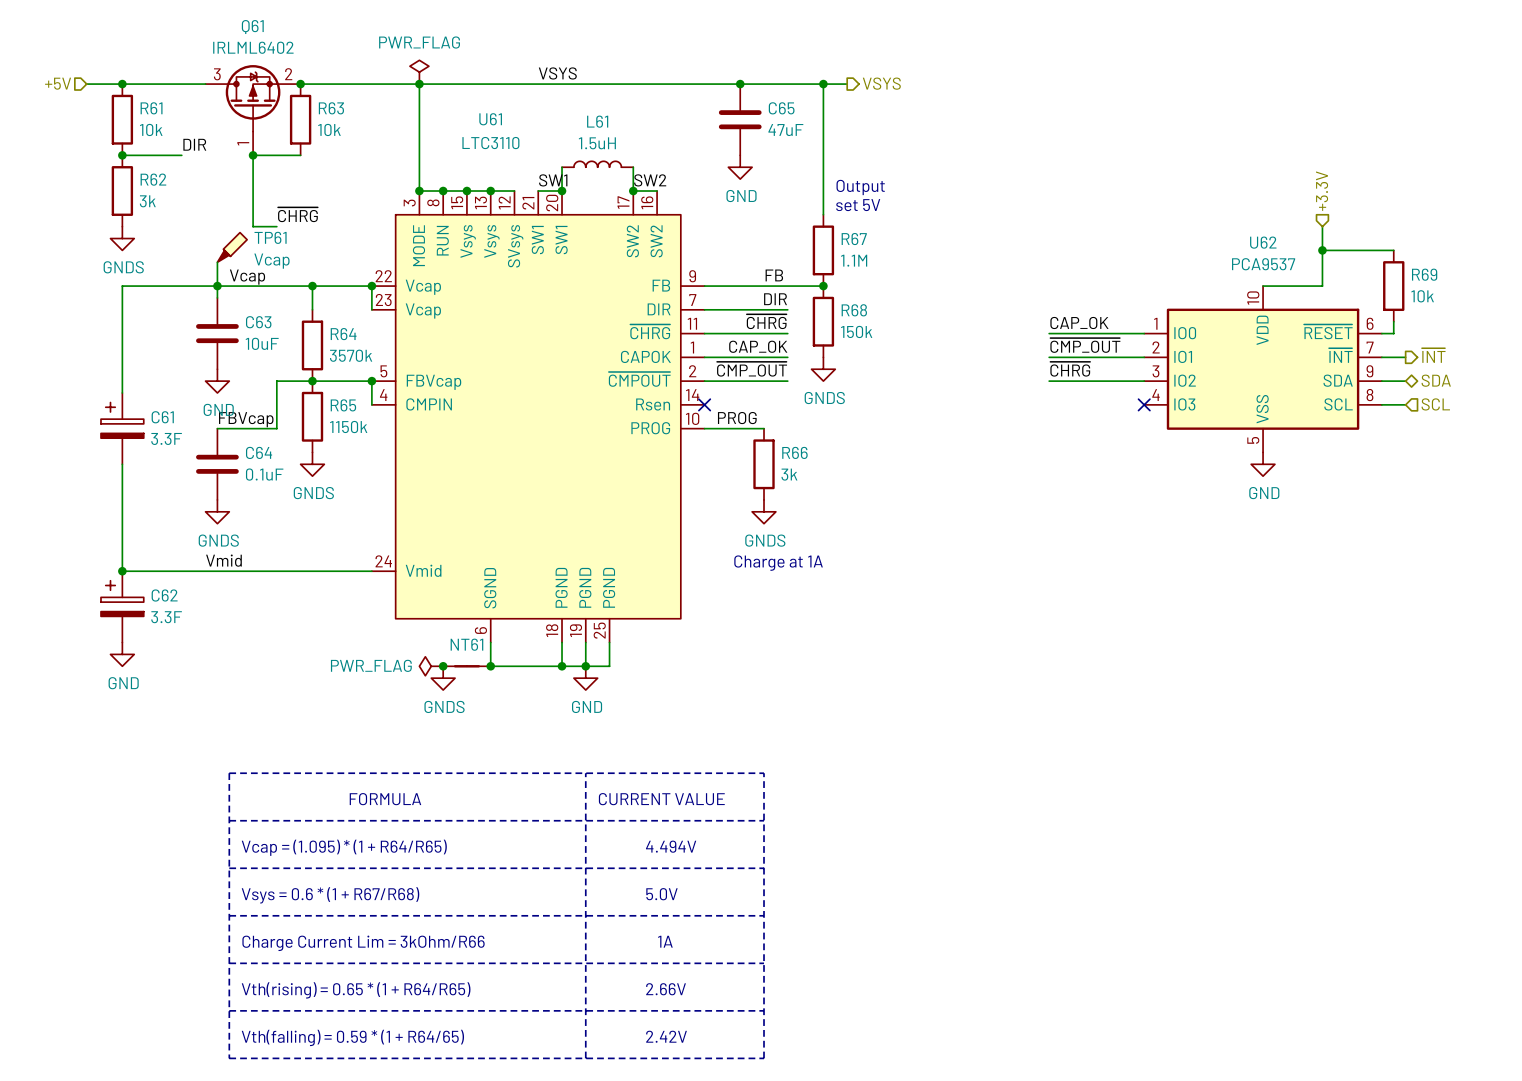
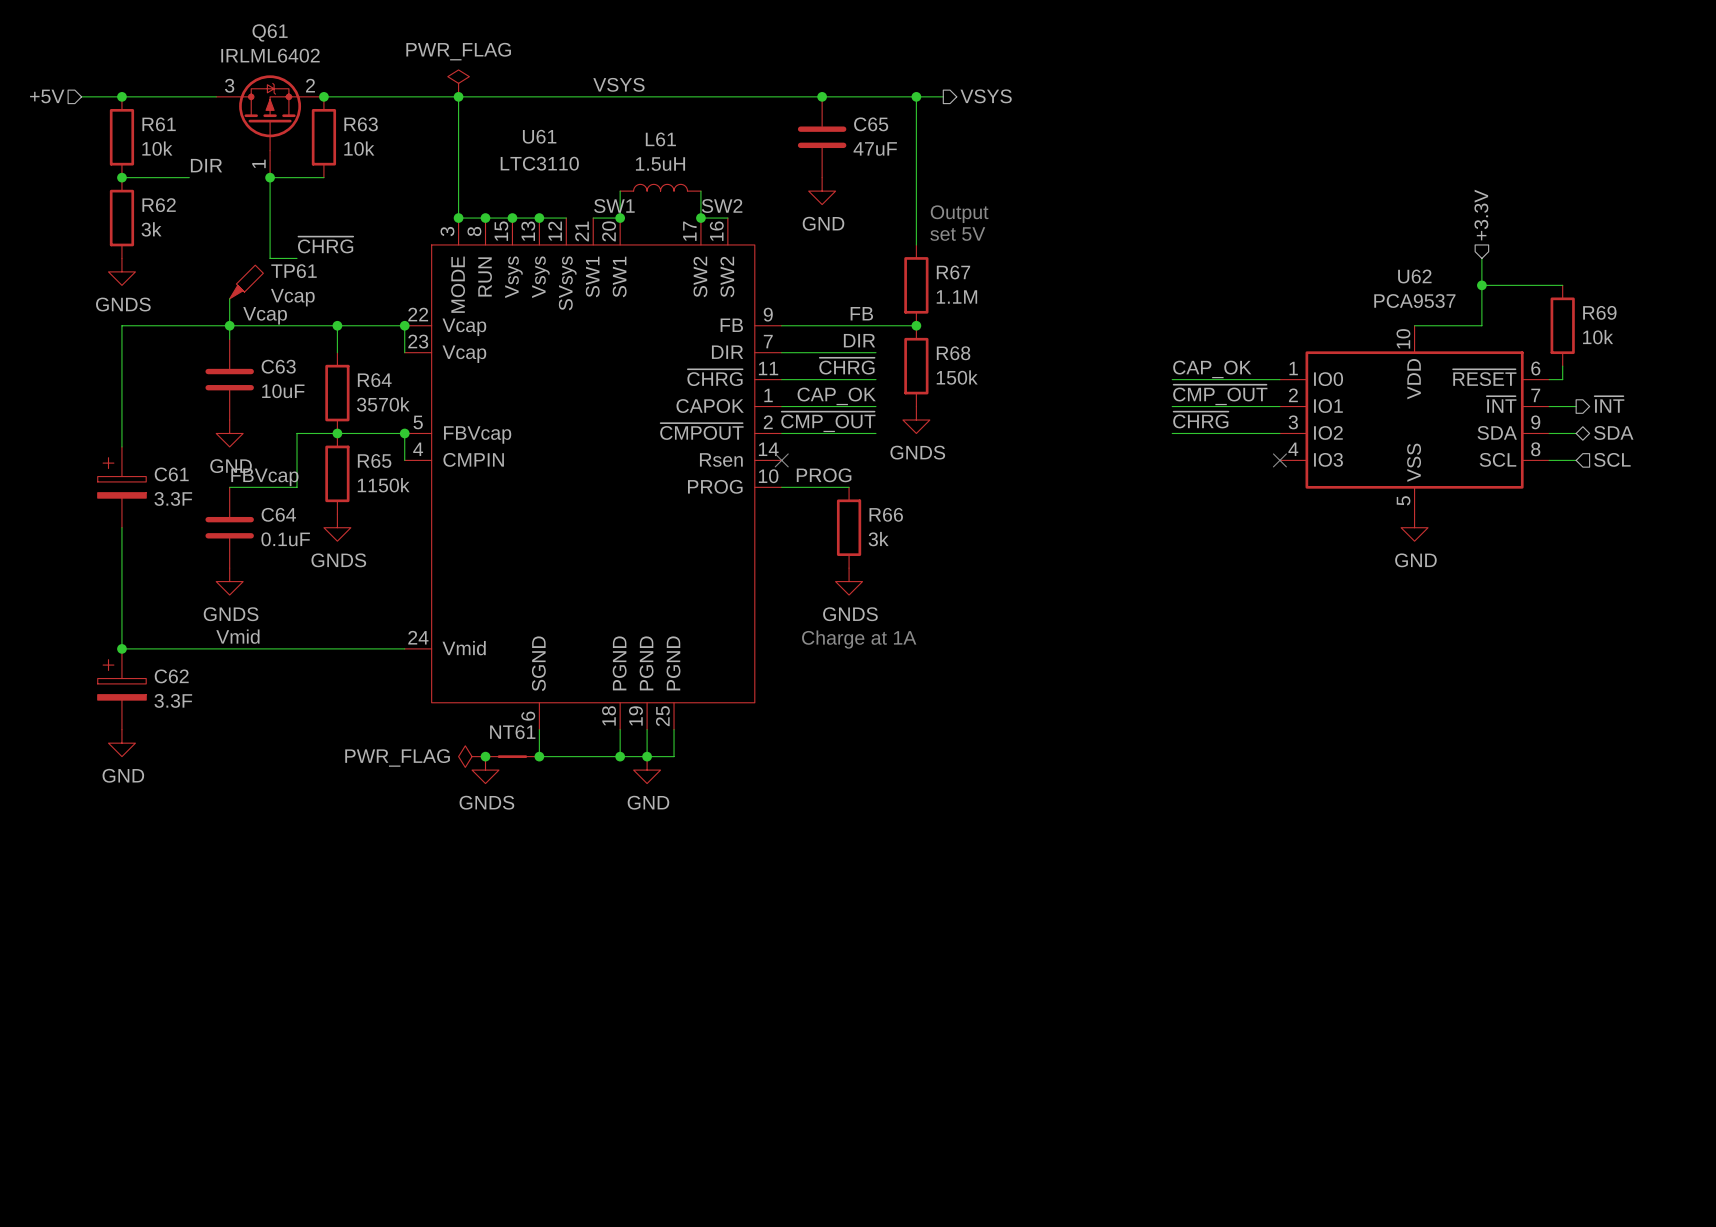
line: (229, 773) (229, 1058) (764, 1058) (764, 773) (229, 773) -> none
line: (585, 773) (585, 1058) -> none
text: FORMULA (385, 799) -> none
text: CURRENT VALUE (661, 799) -> none
line: (229, 820) (764, 820) -> none
text: 4.494V (671, 846) -> none
text: Vcap = (1.095) * (1 + R64/R65) (344, 847) -> none
line: (229, 868) (764, 868) -> none
text: 5.0V (661, 894) -> none
text: Vsys = 0.6 * (1 + R67/R68) (330, 895) -> none
line: (229, 915) (764, 915) -> none
text: 1A (665, 941) -> none
text: Charge Current Lim = 3kOhm/R66 (363, 943) -> none
line: (229, 963) (764, 963) -> none
text: 2.66V (666, 989) -> none
text: Vth(rising) = 0.65 * (1 + R64/R65) (356, 990) -> none
line: (229, 1010) (764, 1010) -> none
text: 2.42V (666, 1036) -> none
text: Vth(falling) = 0.59 * (1 + R64/65) (352, 1037) -> none

